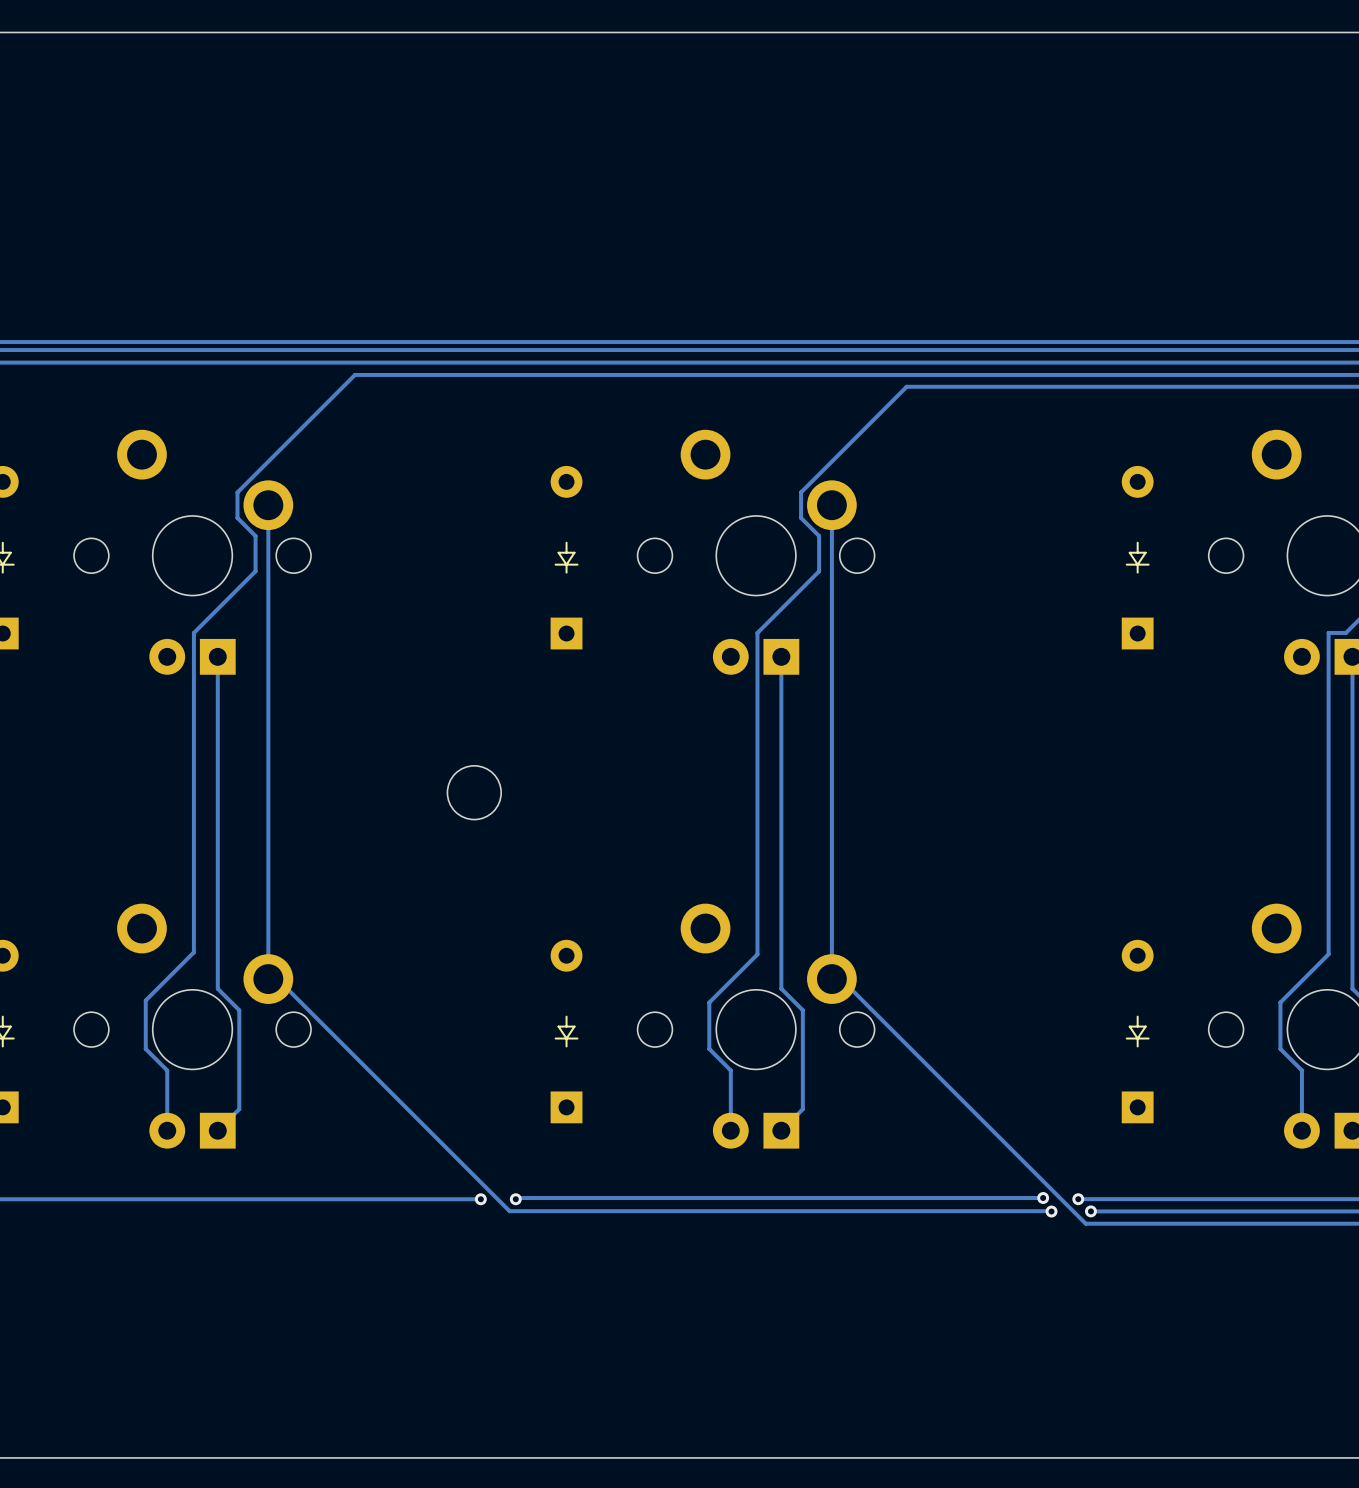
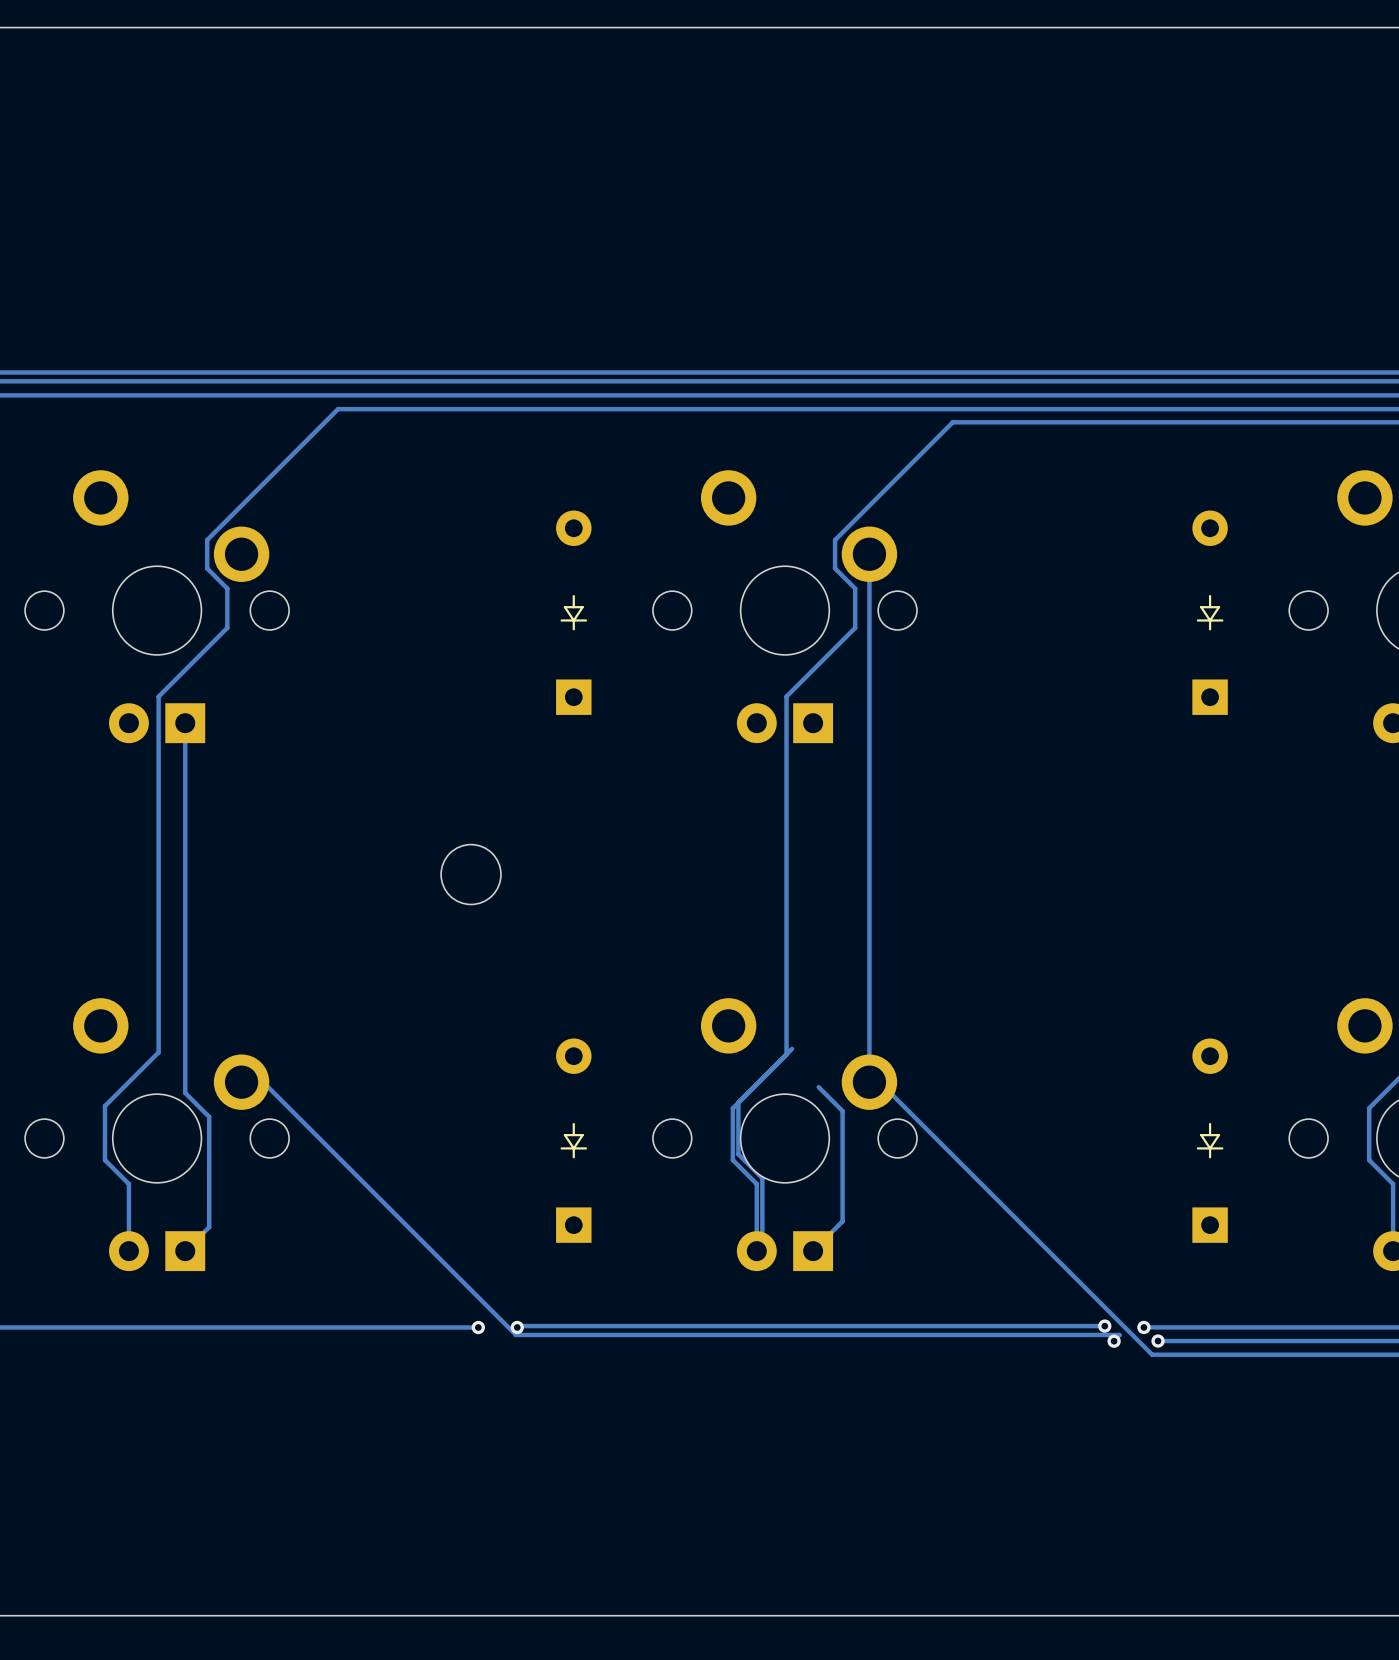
track: (268, 505) (268, 979) (277, 979) (509, 1211) (1051, 1211) -> none
track: (781, 656) (781, 988) (802, 1010) (802, 1109) (781, 1130) -> none
track: none -> (792, 1048) (738, 1102) (738, 1154) (762, 1178) (762, 1245)
track: none -> (257, 1076) (515, 1334) (1119, 1335)
track: none -> (818, 1087) (842, 1111) (842, 1221) (818, 1245)

